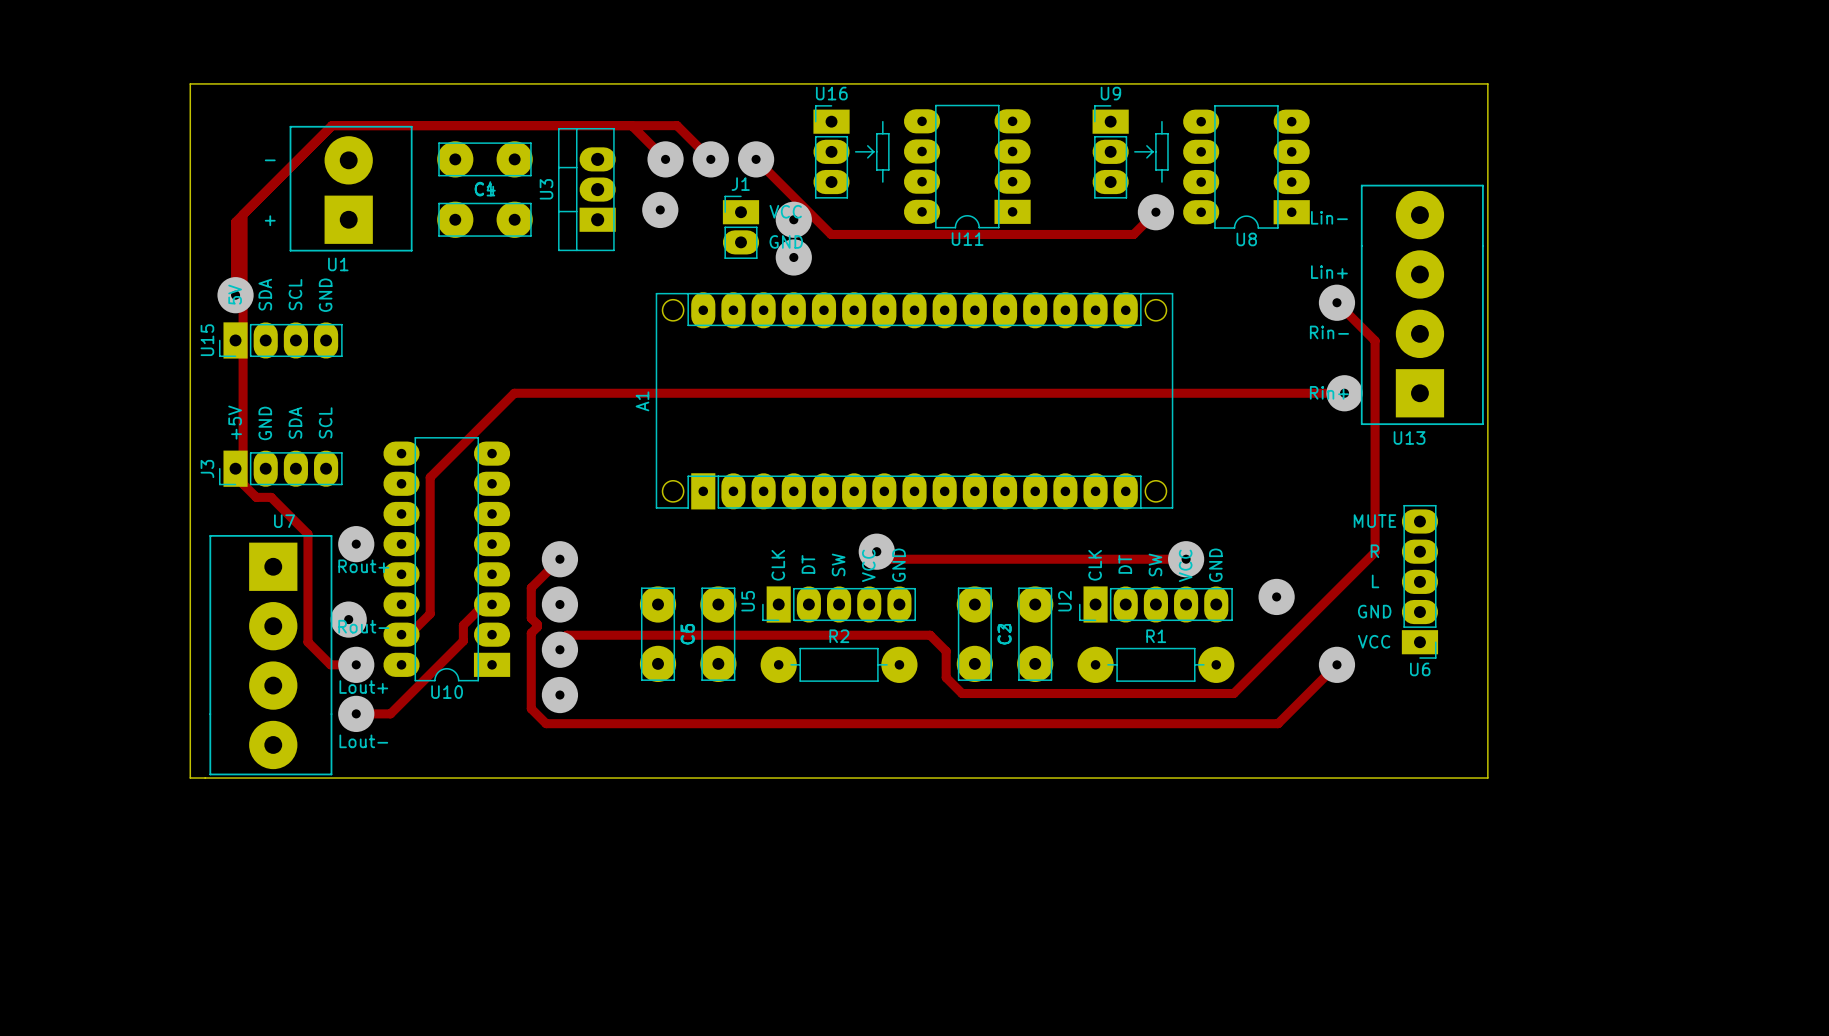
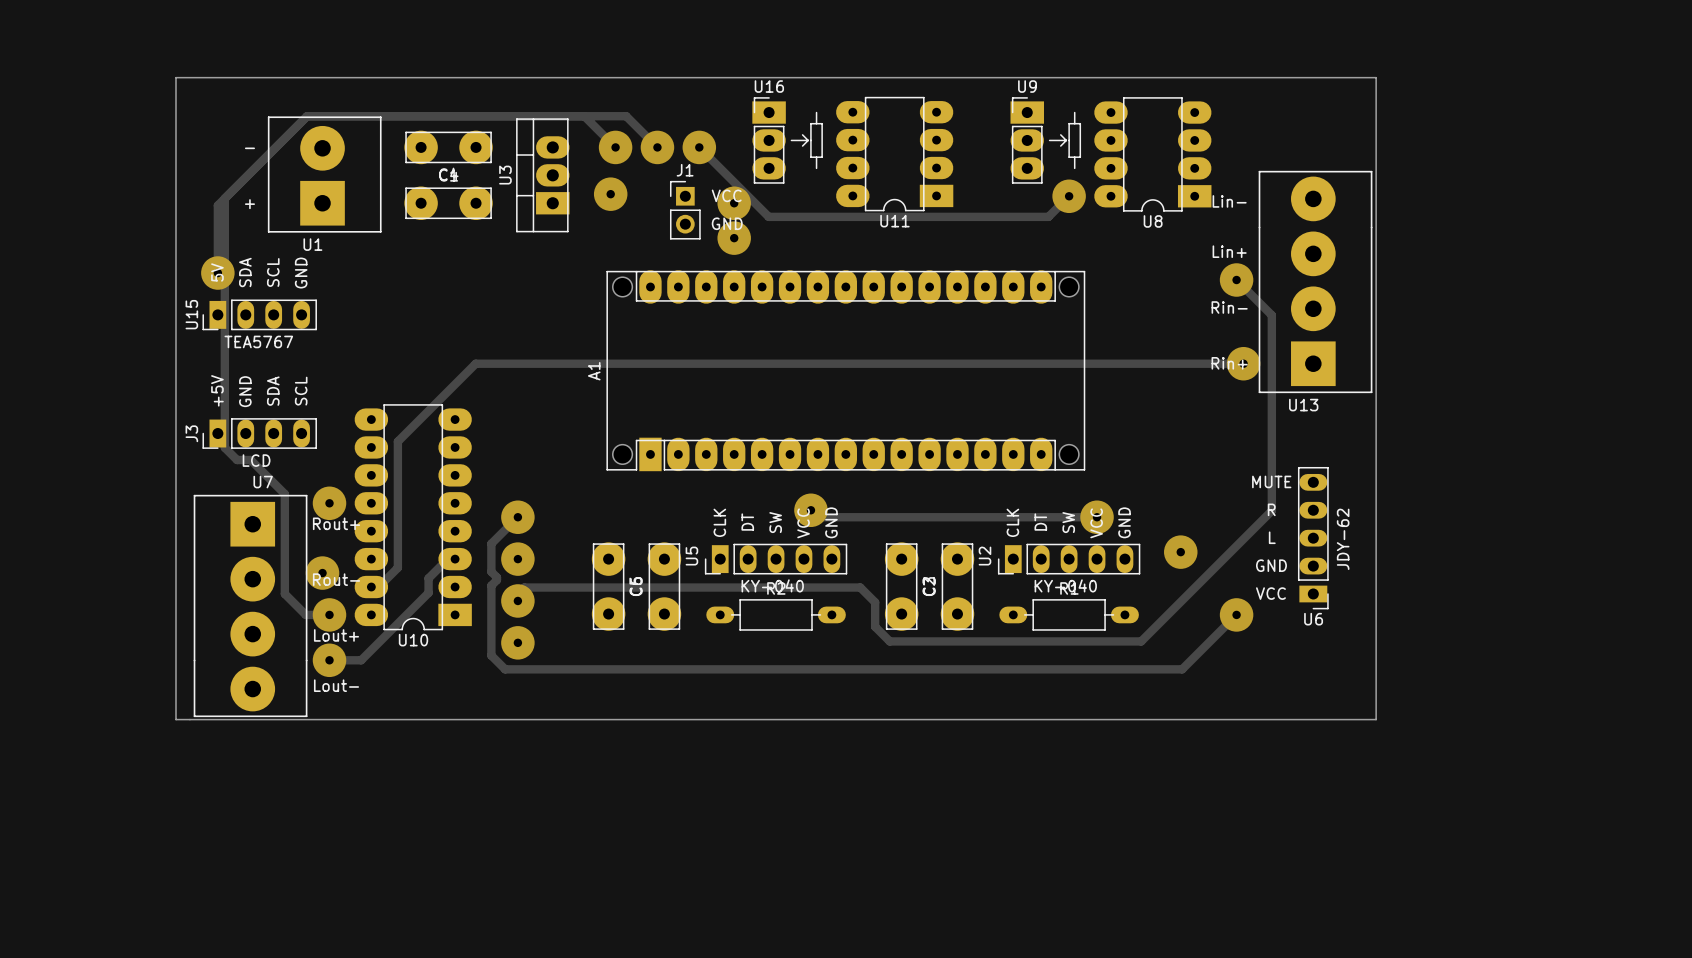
J1 footprint: [722, 195, 760, 259] -> [670, 181, 701, 240]
U15 footprint: [219, 322, 343, 359] -> [202, 299, 317, 331]
J3 footprint: [219, 450, 343, 487] -> [202, 418, 317, 449]
U6 footprint: [1401, 505, 1439, 659] -> [1298, 467, 1329, 610]
U5 footprint: [762, 586, 916, 623] -> [704, 543, 848, 575]
U2 footprint: [1079, 586, 1233, 623] -> [998, 543, 1141, 575]
R2 footprint: [760, 646, 918, 683] -> [706, 599, 846, 631]
R1 footprint: [1077, 646, 1235, 683] -> [999, 599, 1139, 631]

